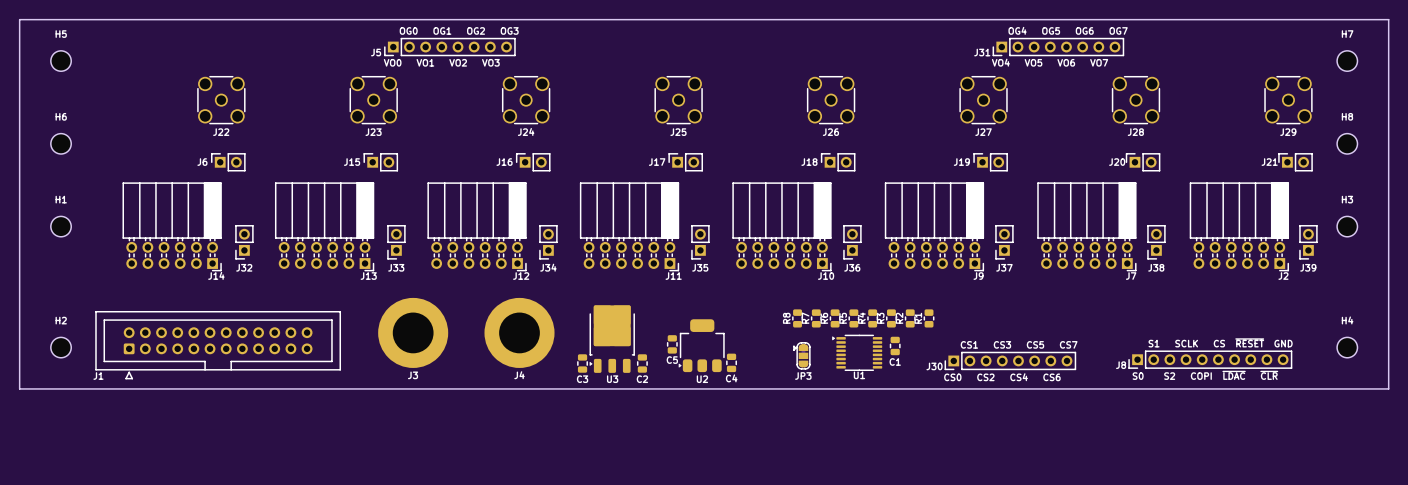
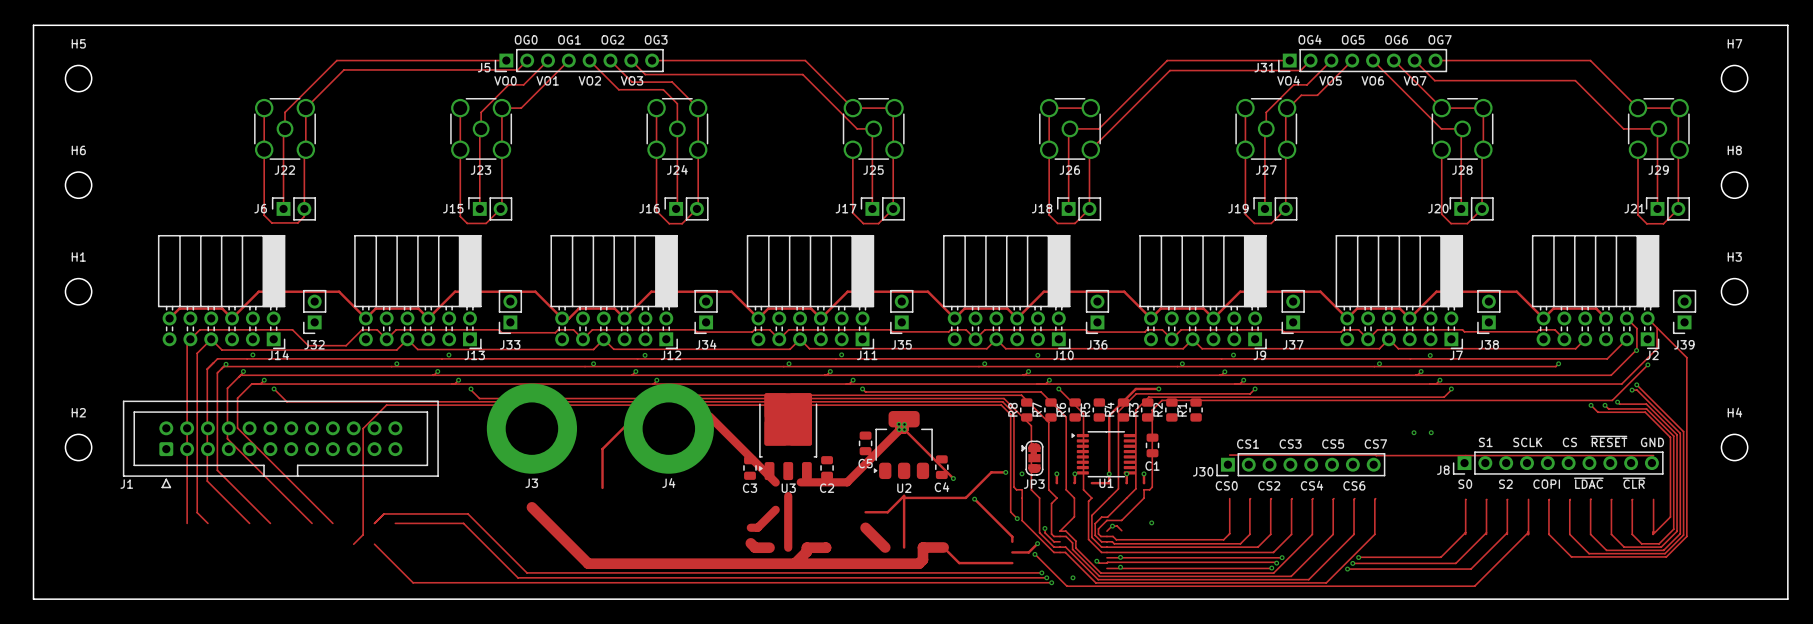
board edge: (26, 19) (19, 19) (19, 388) (1388, 388) -> (33, 25) (33, 599) (1787, 599) (1787, 500)
track: none -> (506, 60) (336, 60) (285, 112) (283, 208)
track: none -> (527, 60) (517, 69) (343, 69) (305, 108) (304, 216) (297, 222) (271, 222) (264, 215) (264, 108)
track: none -> (548, 60) (523, 84) (508, 84) (481, 112) (479, 208)
track: none -> (568, 60) (521, 108) (501, 108) (501, 207) (486, 223) (467, 223) (460, 216) (460, 108)
track: none -> (589, 60) (618, 89) (663, 89) (677, 103) (676, 208)
track: none -> (610, 60) (632, 82) (672, 82) (698, 108) (698, 207) (682, 223) (669, 223) (656, 210) (656, 108)
track: none -> (631, 60) (645, 74) (802, 74) (857, 128) (873, 128) (872, 208)
track: none -> (652, 60) (805, 60) (852, 108) (894, 108) (893, 208) (878, 223) (863, 223) (852, 213) (852, 149)
track: none -> (1289, 60) (1167, 60) (1098, 128) (1068, 130) (1068, 208)
track: none -> (1310, 60) (1300, 70) (1169, 70) (1089, 151) (1089, 208) (1074, 223) (1057, 223) (1049, 215) (1049, 108) (1090, 108)
track: none -> (1331, 60) (1307, 84) (1293, 84) (1266, 112) (1264, 208)
track: none -> (1352, 60) (1317, 95) (1301, 95) (1285, 109) (1285, 208) (1271, 223) (1254, 223) (1245, 214) (1245, 108)
track: none -> (1373, 60) (1441, 128) (1462, 128) (1461, 208)
track: none -> (1393, 60) (1441, 108) (1483, 108) (1482, 208) (1467, 223) (1451, 223) (1441, 214) (1441, 149)
track: none -> (1414, 60) (1434, 80) (1575, 80) (1623, 128) (1658, 128) (1657, 208)
track: none -> (1435, 60) (1590, 60) (1638, 108) (1679, 108) (1678, 208) (1663, 223) (1646, 223) (1638, 214) (1638, 149)
track: none -> (169, 318) (179, 308) (222, 308) (232, 318) (258, 291) (339, 291) (365, 318) (375, 308) (418, 308) (428, 318) (455, 291) (535, 291) (562, 318) (569, 318) (578, 308) (614, 308) (624, 318) (651, 291) (731, 291) (758, 318) (768, 308) (811, 308) (820, 318) (847, 291) (927, 291) (954, 318) (964, 308) (1007, 308) (1017, 318) (1043, 291) (1124, 291) (1150, 318) (1160, 308) (1203, 308) (1213, 318) (1240, 291) (1320, 291) (1347, 318) (1357, 308) (1399, 308) (1409, 318) (1436, 291) (1516, 291) (1543, 318) (1553, 308) (1596, 308) (1606, 318)
track: none -> (1626, 318) (1636, 328) (1636, 349) (1611, 375) (240, 375)
track: none -> (1647, 318) (1686, 357) (1686, 536) (1666, 556) (1571, 556) (1548, 534) (1549, 499)
track: none -> (1657, 327) (1657, 348) (1621, 384) (251, 384) (237, 398) (237, 428) (332, 523)
track: none -> (187, 339) (187, 523)
track: none -> (1564, 339) (1554, 329) (1538, 329) (1537, 331) (1377, 329) (1368, 339) (1358, 329) (1343, 329) (1341, 332) (1181, 329) (1171, 339) (1162, 329) (1147, 329) (1144, 332) (984, 329) (975, 339) (966, 329) (950, 329) (948, 331) (788, 329) (779, 339) (769, 329) (754, 329) (752, 332) (592, 329) (582, 339) (573, 329) (558, 329) (555, 332) (501, 332) (498, 329) (396, 329) (386, 339) (377, 329) (361, 329) (346, 345) (308, 345) (292, 329) (199, 329) (186, 342)
track: none -> (1585, 339) (1575, 348) (1398, 348) (1388, 339) (1379, 348) (1202, 348) (1192, 339) (1183, 348) (1005, 348) (996, 339) (986, 348) (809, 348) (800, 339) (790, 349) (613, 349) (603, 339) (593, 349) (417, 349) (407, 339) (396, 350) (221, 350) (211, 339) (197, 353) (197, 512) (207, 523)
track: none -> (1626, 339) (1607, 358) (217, 358) (207, 369)
via: none -> (1636, 350)
via: none -> (252, 354)
via: none -> (448, 355)
via: none -> (841, 354)
via: none -> (1233, 355)
via: none -> (645, 355)
via: none -> (1037, 355)
via: none -> (1430, 355)
track: none -> (226, 364) (217, 372) (217, 470) (270, 523)
via: none -> (226, 364)
via: none -> (396, 363)
via: none -> (593, 363)
via: none -> (789, 363)
via: none -> (984, 363)
via: none -> (1182, 363)
via: none -> (1379, 363)
track: none -> (1558, 363) (1555, 366) (223, 366)
via: none -> (1558, 363)
track: none -> (1647, 364) (1612, 400) (1161, 400) (1152, 410)
via: none -> (1647, 364)
track: none -> (207, 369) (207, 481) (249, 523)
track: none -> (243, 371) (227, 388) (227, 438) (312, 523)
via: none -> (243, 371)
track: none -> (437, 371) (433, 375)
via: none -> (437, 371)
track: none -> (635, 371) (632, 375)
via: none -> (635, 371)
track: none -> (830, 371) (826, 375)
via: none -> (830, 371)
track: none -> (1028, 371) (1024, 375)
via: none -> (1028, 371)
track: none -> (1224, 371) (1221, 375)
via: none -> (1224, 371)
track: none -> (1421, 371) (1417, 375)
via: none -> (1421, 371)
track: none -> (264, 380) (260, 384)
via: none -> (264, 380)
track: none -> (458, 380) (454, 384)
via: none -> (458, 380)
track: none -> (656, 380) (653, 384)
via: none -> (656, 380)
track: none -> (853, 380) (849, 384)
via: none -> (853, 380)
track: none -> (1049, 380) (1045, 384)
via: none -> (1049, 380)
track: none -> (1243, 380) (1239, 384)
via: none -> (1243, 380)
track: none -> (1439, 380) (1436, 384)
via: none -> (1439, 380)
track: none -> (1636, 384) (1683, 431) (1683, 535) (1665, 553) (1589, 553) (1569, 534) (1570, 499)
via: none -> (1636, 384)
track: none -> (274, 388) (286, 401) (1002, 401) (1013, 413) (1013, 487) (1016, 489) (1022, 489) (1022, 520) (1053, 552) (1065, 552) (1095, 582) (1326, 582) (1374, 534) (1375, 498)
via: none -> (274, 388)
track: none -> (471, 388) (479, 398) (1004, 398) (1031, 425) (1031, 489) (1039, 498) (1039, 532) (1053, 547) (1065, 547) (1098, 579) (1308, 579) (1354, 534) (1354, 498)
via: none -> (471, 388)
track: none -> (666, 388) (672, 395) (1021, 395) (1048, 422) (1048, 489) (1057, 498) (1051, 503) (1051, 534) (1053, 536) (1066, 536) (1072, 542) (1072, 549) (1099, 576) (1291, 576) (1333, 534) (1333, 498)
track: none -> (862, 388) (865, 391) (1041, 391) (1066, 417) (1066, 489) (1074, 498) (1074, 516) (1060, 531) (1065, 531) (1075, 541) (1075, 548) (1100, 573) (1273, 573) (1312, 534) (1313, 498)
via: none -> (862, 388)
track: none -> (1058, 388) (1083, 413) (1083, 489) (1091, 498) (1088, 501) (1088, 539) (1101, 552) (1273, 552) (1291, 534) (1292, 498)
via: none -> (1058, 388)
track: none -> (1158, 388) (1135, 388) (1109, 415) (1109, 483) (1091, 483)
via: none -> (1158, 388)
track: none -> (1255, 388) (1250, 393) (1136, 393) (1118, 411)
via: none -> (1255, 388)
track: none -> (1451, 388) (1444, 397) (1148, 397) (1135, 410)
via: none -> (1451, 388)
track: none -> (1632, 390) (1637, 390) (1680, 433) (1680, 533) (1663, 550) (1606, 550) (1590, 534) (1591, 499)
via: none -> (1632, 390)
track: none -> (1617, 402) (1619, 404) (1646, 404) (1677, 434) (1677, 531) (1661, 547) (1624, 547) (1611, 534) (1611, 499)
via: none -> (1617, 402)
track: none -> (1591, 405) (1597, 412) (1645, 412) (1670, 437) (1670, 517) (1653, 534) (1653, 499)
via: none -> (1591, 405)
track: none -> (1605, 405) (1608, 408) (1646, 408) (1673, 436) (1673, 529) (1659, 543) (1641, 543) (1632, 534) (1632, 499)
via: none -> (1605, 405)
track: none -> (1135, 410) (1135, 488) (1107, 517) (1101, 517) (1095, 523) (1095, 535) (1101, 541) (1112, 541) (1114, 543) (1240, 543) (1249, 534) (1250, 498)
track: none -> (1152, 410) (1152, 487) (1149, 489) (1144, 489) (1144, 498) (1121, 520) (1106, 520) (1098, 528) (1098, 534) (1100, 536) (1113, 536) (1116, 539) (1223, 539) (1229, 533) (1229, 498)
track: none -> (1118, 411) (1118, 488) (1091, 515) (1091, 537) (1101, 547) (1257, 547) (1270, 534) (1271, 498)
track: none -> (709, 416) (775, 482)
track: none -> (634, 417) (602, 449) (602, 487)
track: none -> (898, 424) (899, 430) (847, 482) (800, 482)
via: none -> (898, 424)
via: none -> (904, 424)
track: none -> (899, 429) (904, 429) (904, 424) (904, 429) (953, 478)
via: none -> (899, 429)
via: none -> (904, 429)
via: none -> (1414, 432)
via: none -> (1431, 432)
track: none -> (1229, 455) (1653, 455)
track: none -> (1005, 472) (991, 472) (965, 497) (904, 497)
via: none -> (1005, 472)
via: none -> (1022, 473)
track: none -> (1056, 473) (1057, 483)
via: none -> (1056, 473)
track: none -> (1074, 473) (1074, 483)
via: none -> (1074, 473)
via: none -> (1109, 473)
track: none -> (1126, 473) (1126, 483)
via: none -> (1126, 473)
track: none -> (1143, 473) (1143, 483)
via: none -> (1143, 473)
via: none -> (953, 478)
track: none -> (788, 496) (788, 547)
track: none -> (974, 499) (1012, 536) (1012, 541)
via: none -> (974, 499)
track: none -> (1465, 499) (1465, 534)
track: none -> (1486, 499) (1486, 534)
track: none -> (1507, 499) (1507, 534)
track: none -> (1528, 499) (1528, 534) (1528, 531)
track: none -> (531, 507) (588, 563) (919, 563) (922, 559) (922, 547) (943, 547) (959, 563) (1012, 563)
track: none -> (775, 509) (757, 527) (750, 527)
track: none -> (865, 512) (887, 512) (904, 495) (904, 547)
track: none -> (384, 513) (374, 523)
track: none -> (383, 513) (468, 513) (526, 572) (1041, 572)
track: none -> (1017, 518) (1010, 512) (1010, 414) (1001, 405) (386, 405) (363, 428) (363, 534) (353, 544)
via: none -> (1017, 518)
track: none -> (395, 523) (463, 523) (517, 577) (1046, 577)
via: none -> (1151, 522)
via: none -> (1112, 526)
track: none -> (865, 527) (885, 547)
track: none -> (1044, 528) (1045, 533) (1053, 541) (1060, 541)
via: none -> (1044, 528)
track: none -> (1121, 530) (1117, 526) (1112, 526) (1106, 531)
track: none -> (1465, 532) (1440, 557) (1358, 557)
track: none -> (1486, 532) (1455, 563) (1352, 563)
track: none -> (1507, 532) (1471, 569) (1347, 569)
track: none -> (1528, 532) (1474, 586) (1066, 586) (1035, 554)
track: none -> (374, 544) (413, 582) (1051, 582)
track: none -> (750, 543) (755, 547) (769, 547)
track: none -> (1037, 543) (1028, 552) (1012, 552)
via: none -> (1037, 543)
track: none -> (826, 547) (806, 547) (806, 551) (794, 563)
via: none -> (1034, 554)
via: none -> (1120, 557)
track: none -> (1282, 557) (1106, 557)
via: none -> (1282, 557)
via: none -> (1358, 557)
via: none -> (1096, 561)
track: none -> (1097, 561) (1099, 563) (1276, 563)
via: none -> (1276, 563)
via: none -> (1352, 563)
via: none -> (1120, 567)
track: none -> (1271, 568) (1106, 568)
via: none -> (1271, 568)
via: none -> (1347, 569)
via: none -> (1041, 572)
via: none -> (1046, 577)
via: none -> (1072, 577)
via: none -> (1051, 582)

